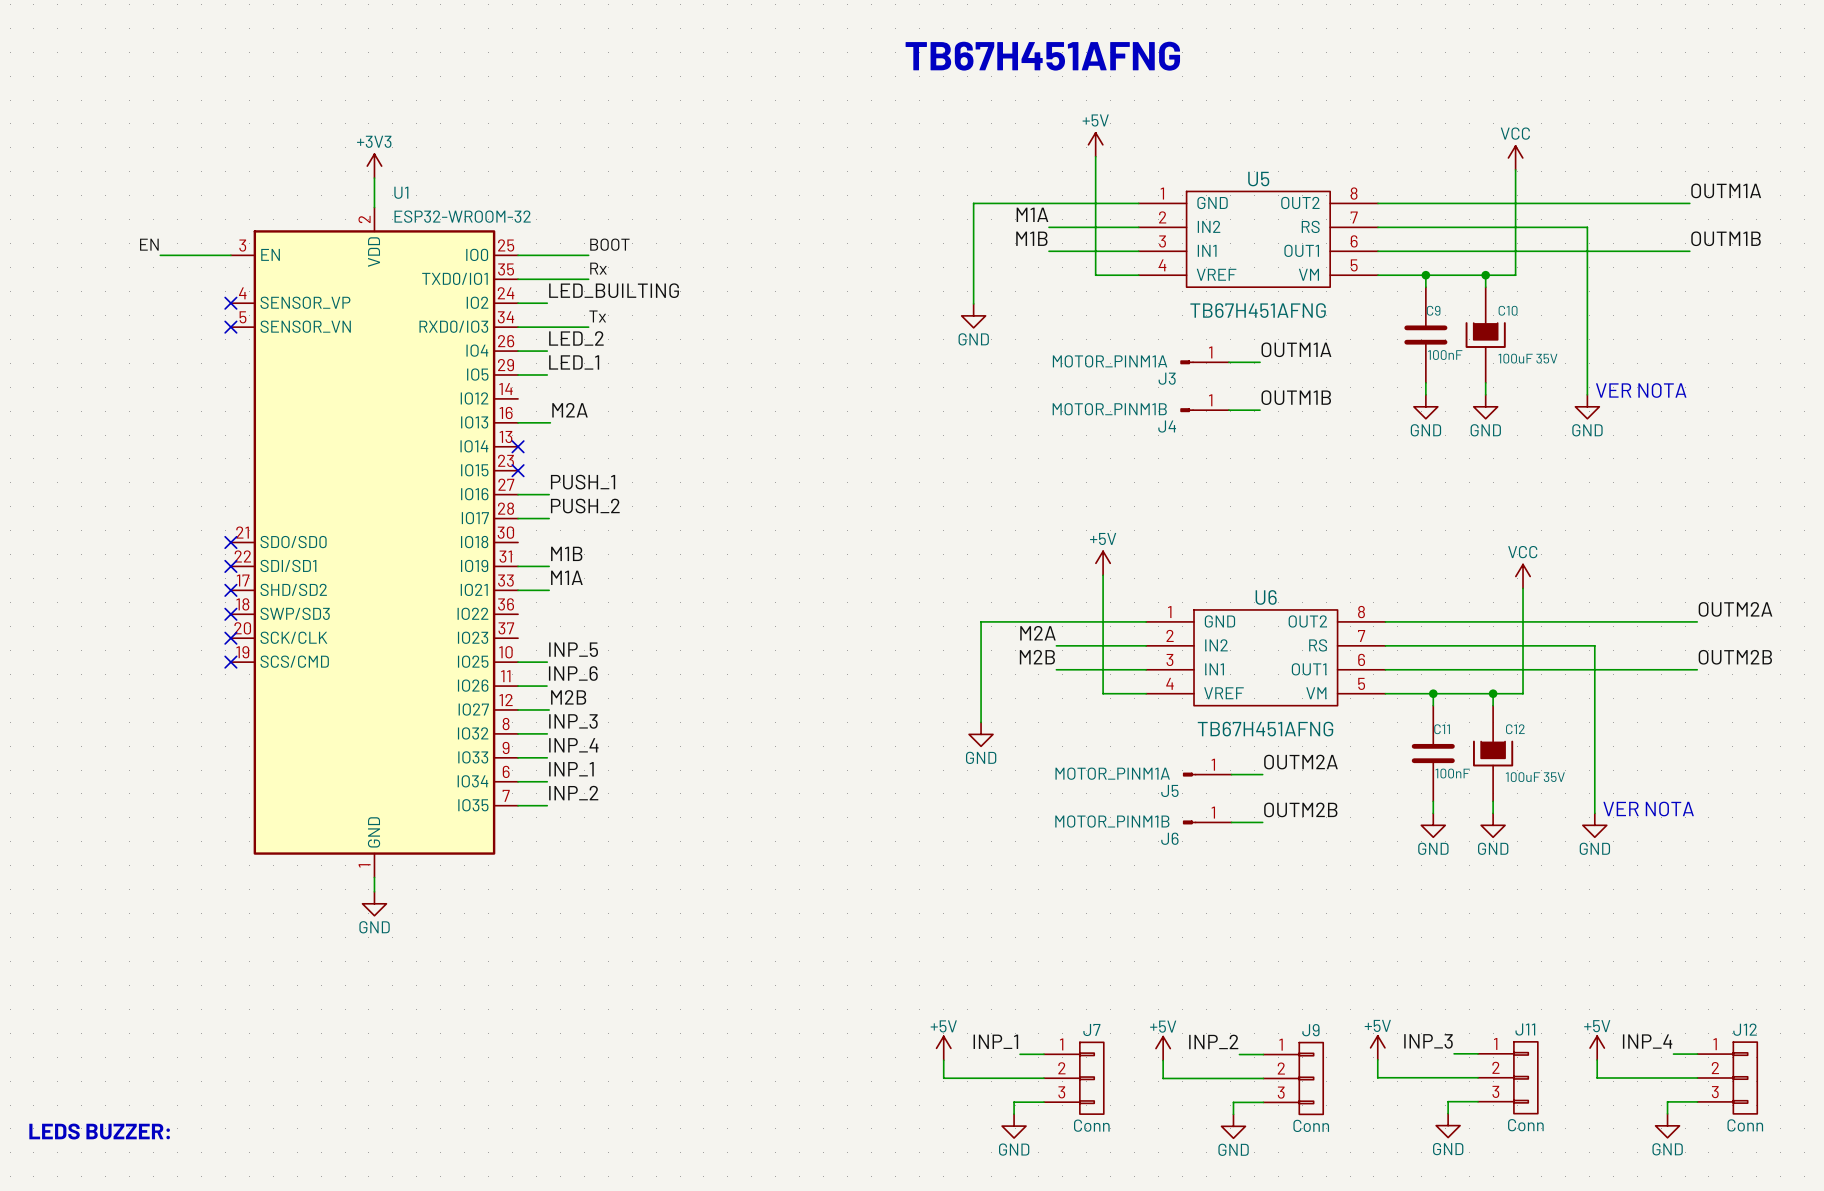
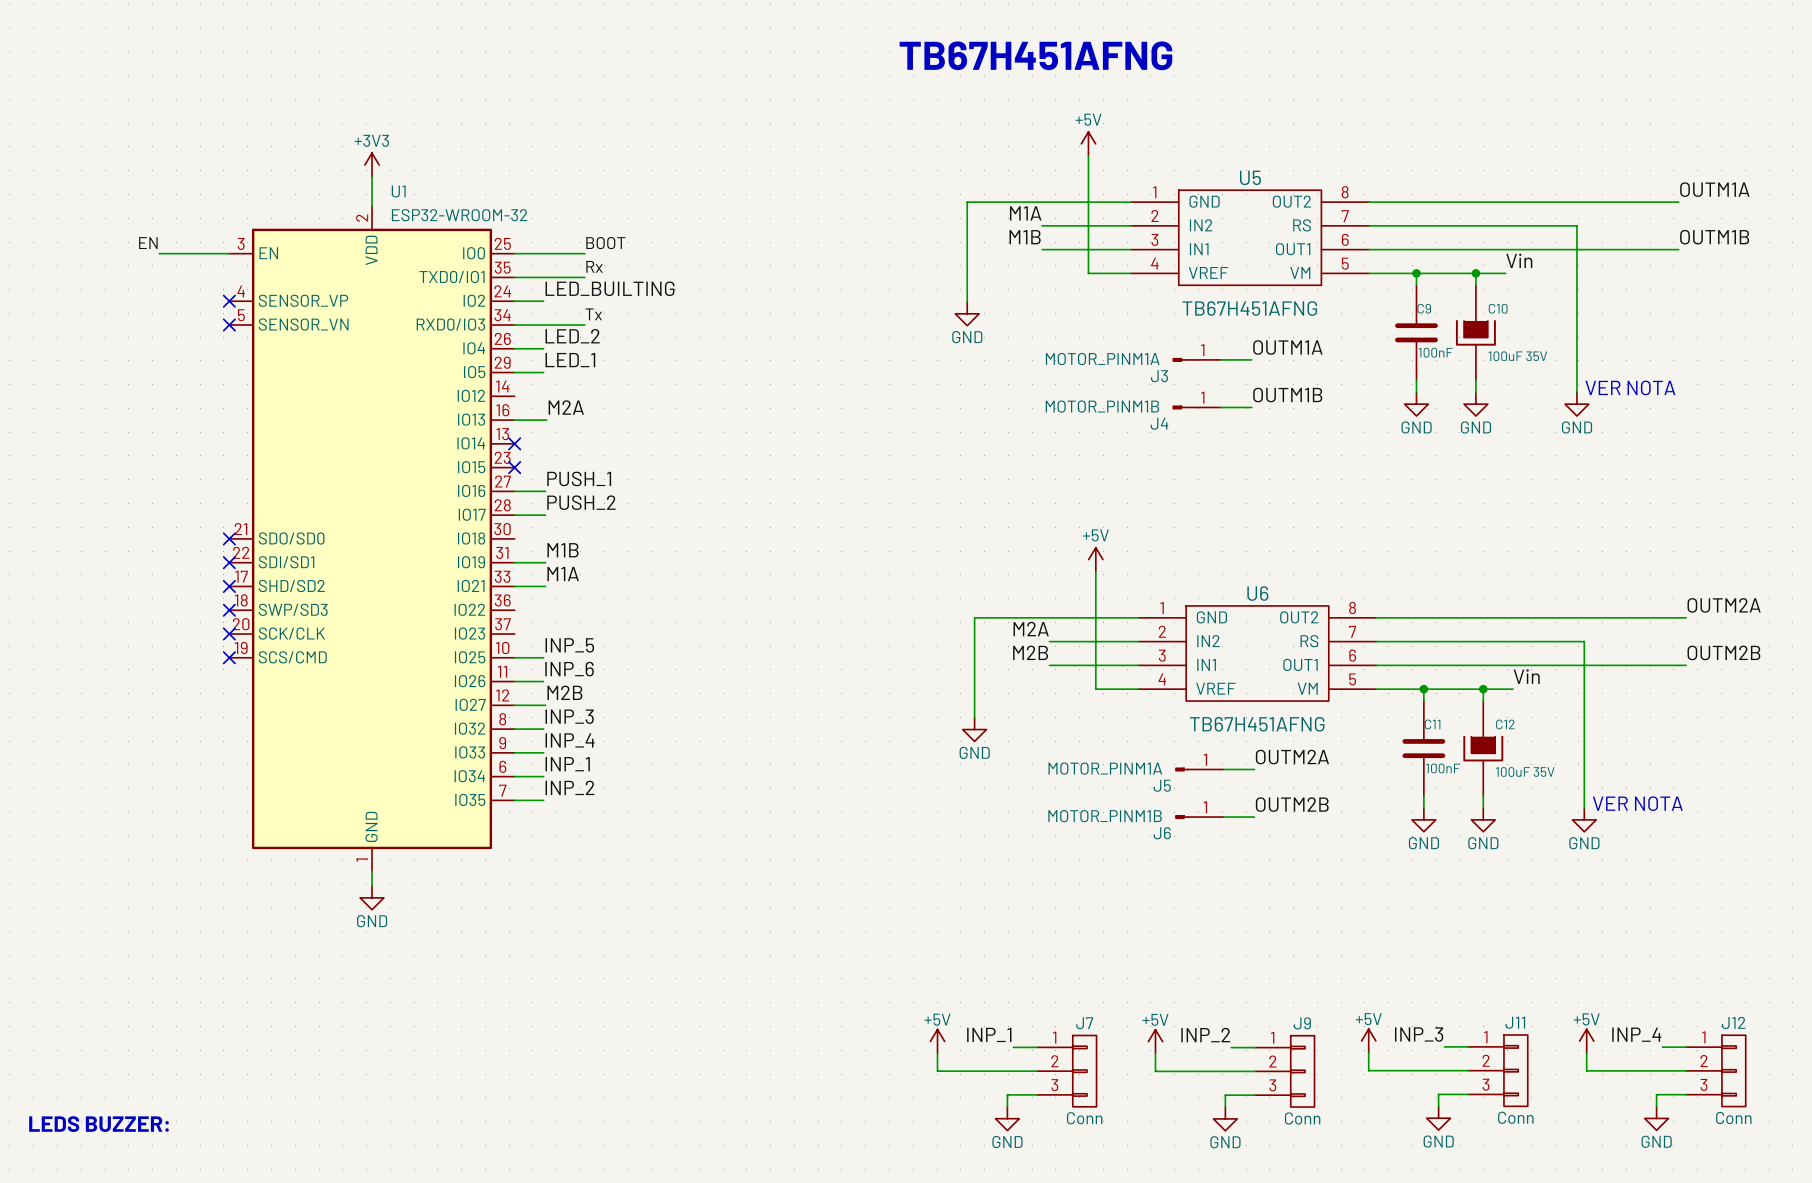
power symbol: VCC (1515, 157) -> none
wire: (1515, 169) (1515, 275) -> none
label: none -> Vin (1519, 260)
power symbol: VCC (1523, 576) -> none
wire: (1523, 588) (1523, 693) -> none
label: none -> Vin (1526, 676)

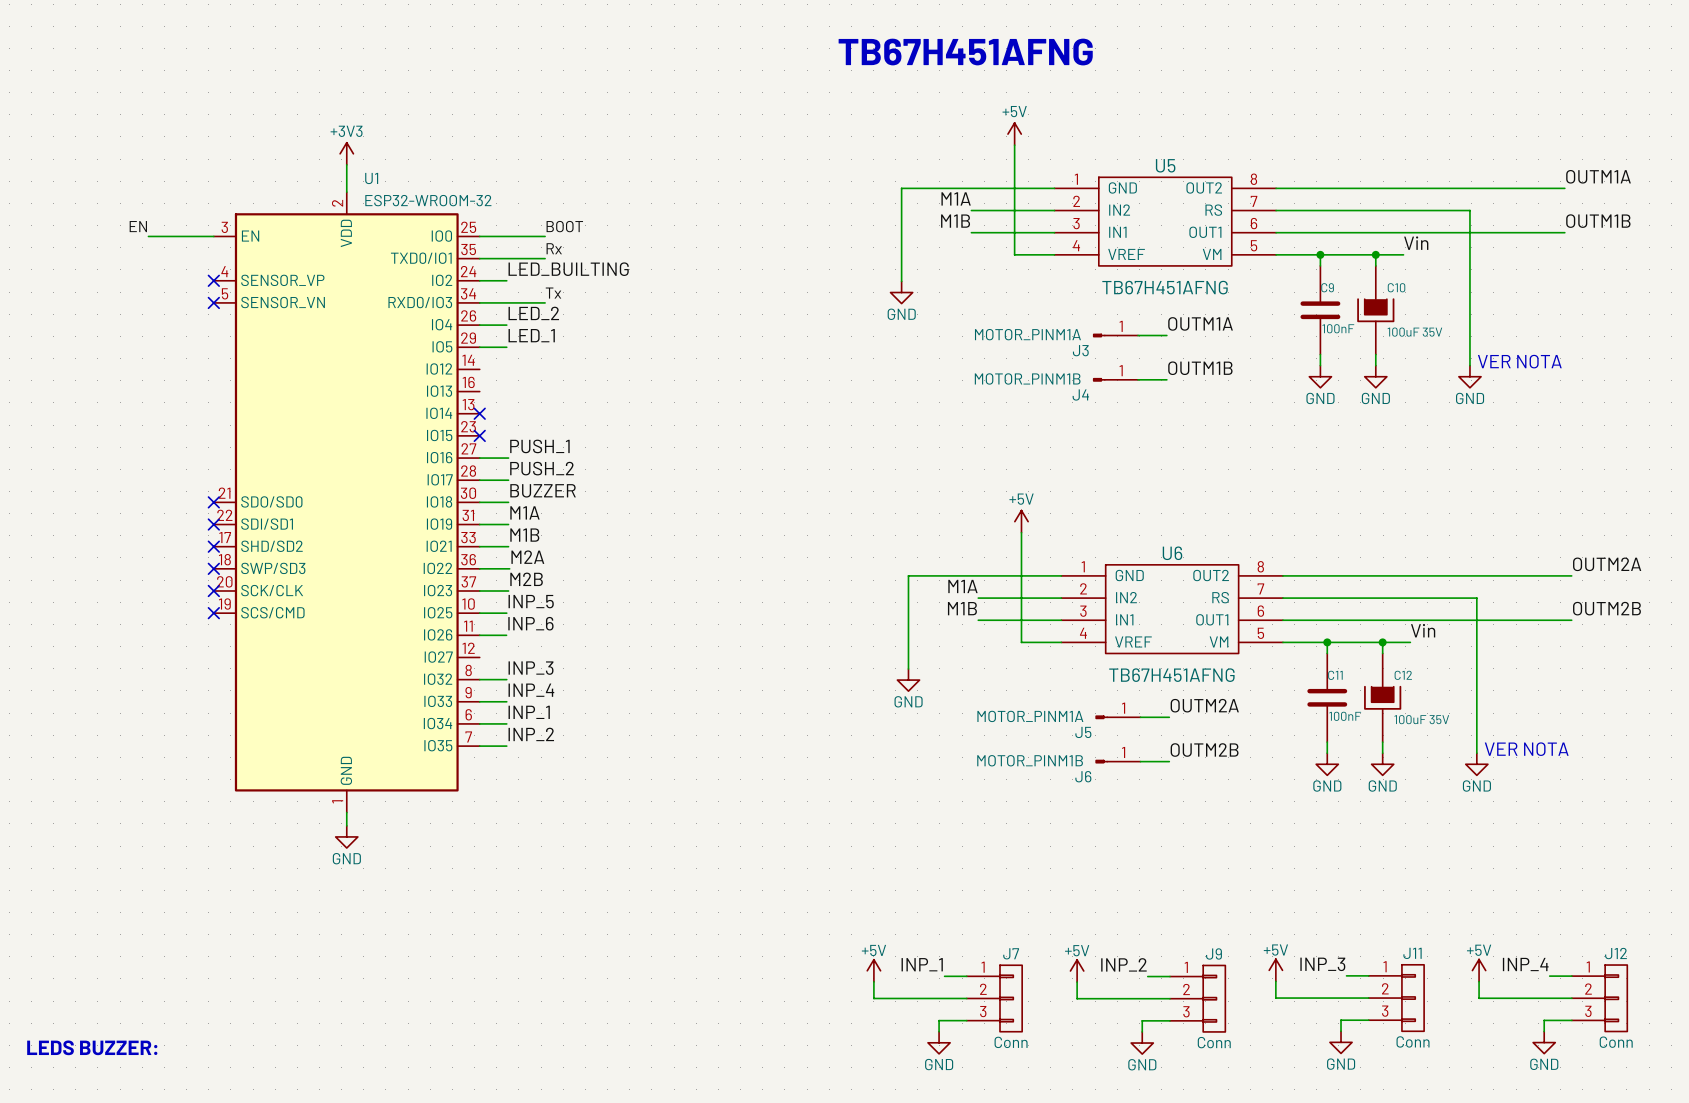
label position: M2A (566, 407) -> M2A (527, 557)
wire: (514, 420) (546, 420) -> (479, 568) (509, 568)
label: none -> BUZZER (543, 490)
wire: none -> (479, 502) (508, 502)
label: M1B (562, 550) -> M1A (524, 512)
label: M1A (563, 574) -> M1B (524, 535)
label: M2A (1031, 629) -> M1A (962, 586)
label: M2B (1030, 652) -> M1B (962, 608)
label position: M2B (564, 692) -> M2B (526, 579)
wire: (514, 705) (545, 705) -> (479, 590) (508, 590)

